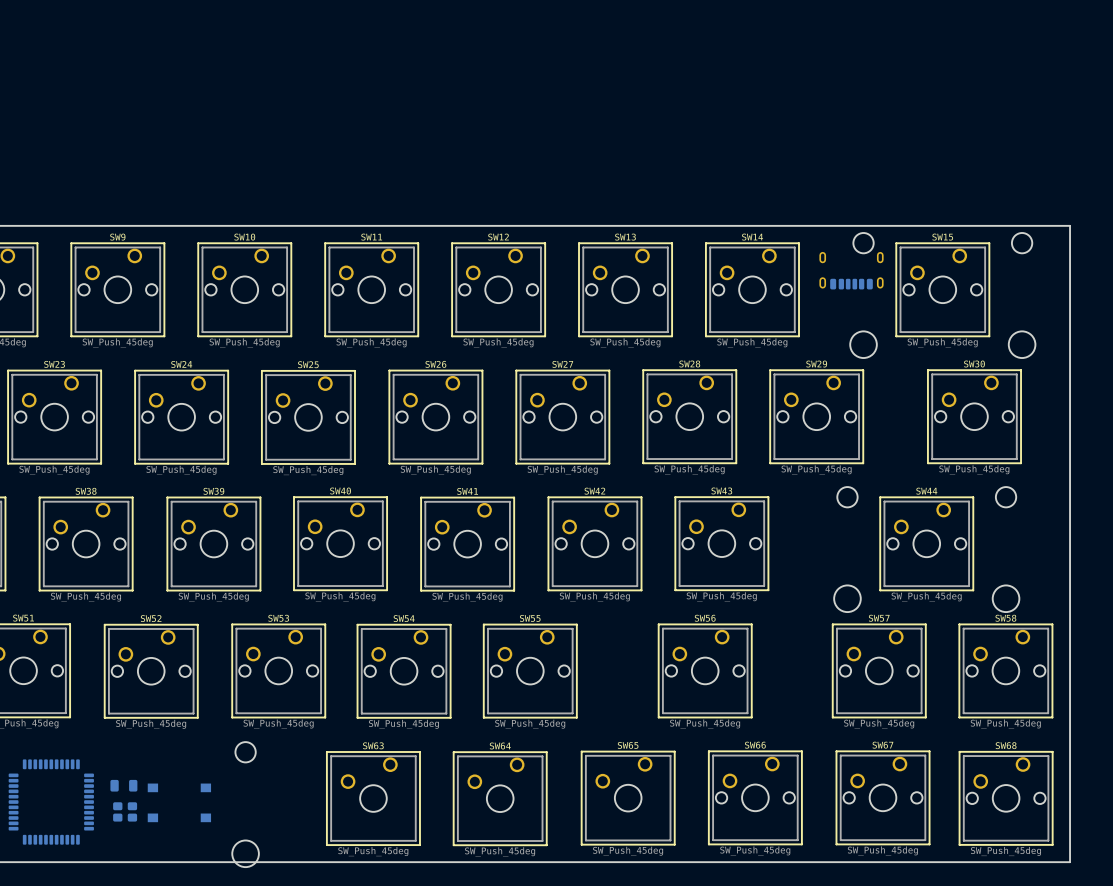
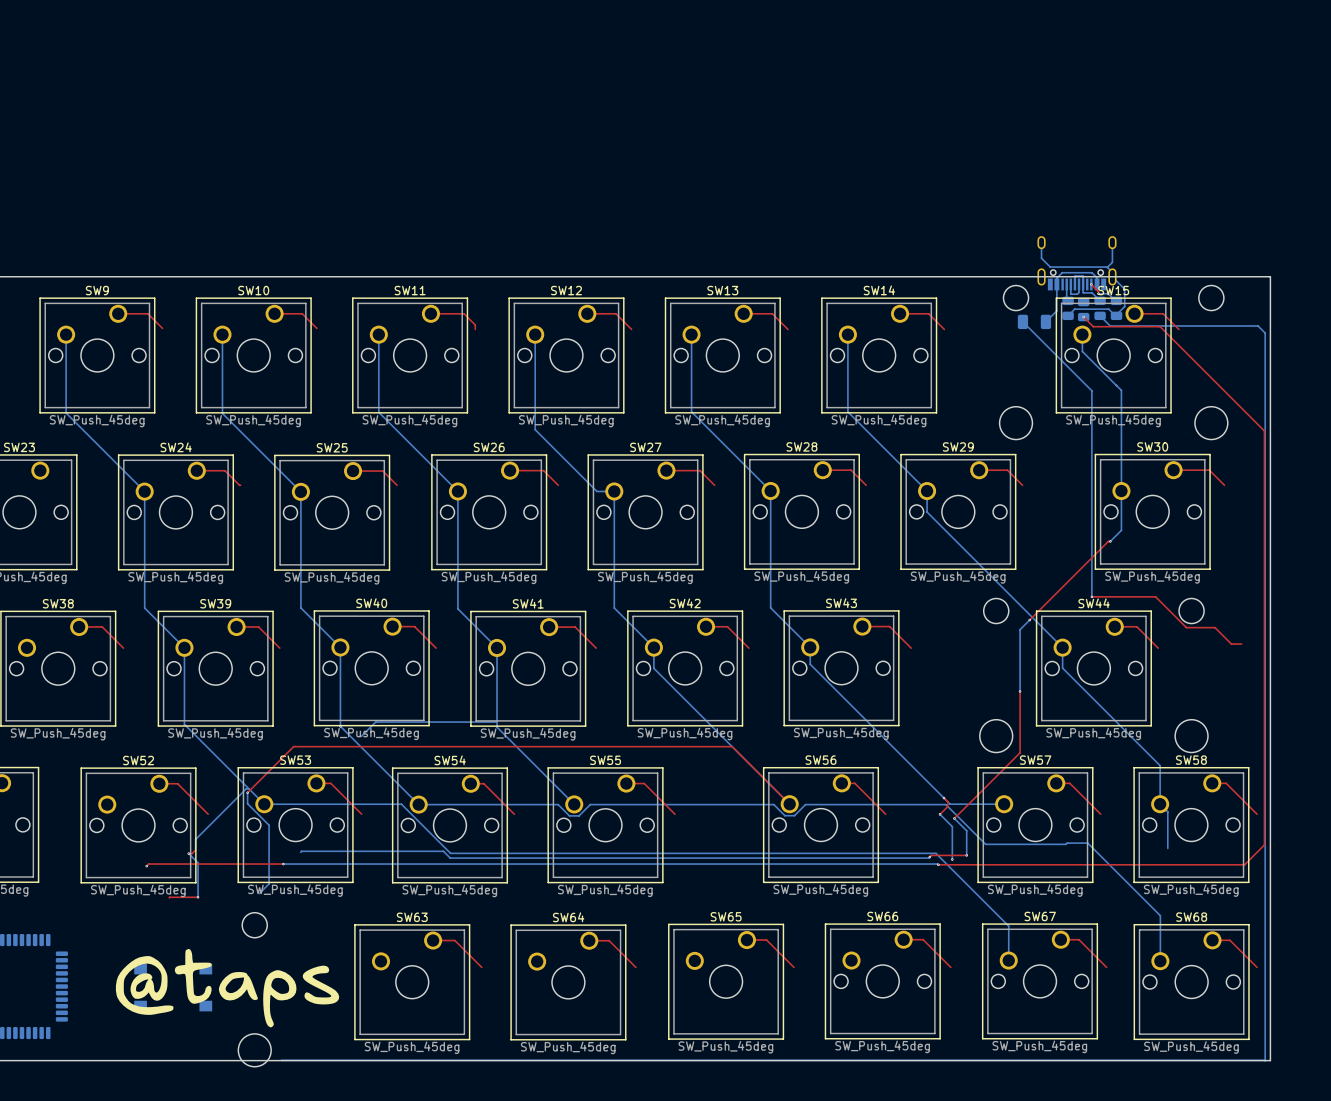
bottom track: none -> (1041, 242) (1041, 258) (1050, 267) (1107, 267) (1112, 272) (1112, 276) (1124, 289) (1124, 306) (1115, 315) (1108, 309) (1074, 309) (1068, 315)
bottom track: none -> (1112, 242) (1112, 262) (1107, 267)
part: none -> (1076, 263)
bottom track: none -> (1066, 284) (1068, 300)
bottom track: none -> (1070, 284) (1071, 294) (1079, 292) (1079, 284)
bottom track: none -> (1074, 284) (1074, 276) (1082, 276) (1083, 292) (1092, 292) (1100, 300)
top track: none -> (1091, 284) (1098, 293)
via: none -> (1091, 284)
bottom track: none -> (1097, 284) (1097, 277) (1091, 272) (1062, 272) (1056, 278) (1056, 310) (1045, 321)
bottom track: none -> (1098, 293) (1108, 293) (1115, 300)
via: none -> (1098, 293)
part: none -> (1068, 308)
part: none -> (1100, 308)
part: none -> (1116, 308)
part: none -> (1083, 309)
top track: none -> (118, 313) (147, 313) (162, 328)
top track: none -> (274, 313) (302, 313) (316, 328)
top track: none -> (430, 313) (464, 313) (475, 324) (475, 329)
top track: none -> (587, 313) (615, 313) (631, 329)
top track: none -> (743, 313) (772, 313) (787, 329)
top track: none -> (900, 313) (928, 313) (944, 329)
top track: none -> (1134, 313) (1163, 313) (1178, 329)
bottom track: none -> (1100, 315) (1110, 326) (1258, 326) (1265, 333) (1265, 1060) (281, 1060)
top track: none -> (1083, 317) (1093, 326) (1160, 326) (1264, 431) (1264, 844) (1244, 864) (938, 864)
via: none -> (1083, 317)
bottom track: none -> (1022, 321) (1091, 390) (1091, 596)
part: none -> (1034, 321)
part: (851, 270) -> none
bottom track: none -> (66, 334) (66, 413) (144, 491) (144, 608) (184, 647) (184, 724) (264, 804) (401, 804) (450, 853) (935, 853) (1008, 926) (1008, 960)
bottom track: none -> (222, 334) (222, 413) (300, 491) (300, 607) (340, 647) (340, 726) (418, 804) (558, 804) (569, 815) (579, 815) (590, 804) (773, 804) (784, 815) (794, 815) (805, 804) (945, 804) (985, 844) (1087, 843) (1160, 915) (1160, 961)
bottom track: none -> (378, 334) (378, 412) (457, 491) (457, 608) (497, 647) (497, 727) (574, 804)
bottom track: none -> (535, 334) (535, 429) (596, 491) (614, 491) (614, 608) (653, 647) (653, 668) (789, 804)
bottom track: none -> (691, 334) (691, 411) (770, 491) (770, 607) (810, 647) (810, 664) (950, 804) (1004, 804)
bottom track: none -> (847, 334) (847, 411) (927, 491) (927, 512) (1062, 647) (1062, 668) (1160, 765) (1160, 804) (1167, 811) (1167, 848)
bottom track: none -> (1082, 334) (1082, 351) (1121, 390) (1121, 530) (1110, 541)
top track: none -> (822, 470) (851, 470) (866, 485)
top track: none -> (979, 470) (1007, 470) (1022, 485)
top track: none -> (1173, 470) (1209, 470) (1224, 485)
top track: none -> (196, 470) (225, 470) (240, 485)
top track: none -> (353, 471) (382, 471) (397, 485)
top track: none -> (510, 470) (543, 470) (558, 485)
top track: none -> (666, 470) (699, 470) (714, 485)
top track: none -> (1110, 541) (1029, 619)
via: none -> (1110, 541)
top track: none -> (1091, 596) (1155, 596) (1186, 627) (1215, 627) (1231, 644) (1241, 644)
via: none -> (1091, 596)
bottom track: none -> (1029, 619) (1020, 629) (1020, 691)
via: none -> (1029, 619)
top track: none -> (392, 626) (414, 626) (436, 648)
top track: none -> (862, 626) (889, 626) (911, 648)
top track: none -> (79, 626) (102, 626) (123, 648)
top track: none -> (236, 626) (258, 626) (279, 648)
top track: none -> (549, 627) (575, 627) (596, 648)
top track: none -> (706, 626) (727, 626) (748, 648)
top track: none -> (1114, 626) (1136, 626) (1158, 648)
top track: none -> (1020, 691) (1020, 752) (954, 818)
via: none -> (1020, 691)
bottom track: none -> (497, 722) (375, 722) (361, 736)
via: none -> (340, 726)
top track: none -> (159, 783) (177, 783) (208, 814)
top track: none -> (316, 783) (330, 783) (361, 814)
top track: none -> (470, 783) (483, 783) (514, 814)
top track: none -> (626, 783) (644, 783) (674, 814)
top track: none -> (841, 783) (854, 783) (885, 814)
top track: none -> (1056, 783) (1069, 783) (1100, 814)
top track: none -> (1212, 783) (1226, 783) (1257, 814)
bottom track: none -> (249, 789) (246, 789) (195, 839) (195, 850)
top track: none -> (247, 792) (293, 746) (732, 746) (789, 804)
bottom track: none -> (247, 792) (247, 803) (269, 825) (269, 883) (259, 893)
via: none -> (247, 792)
top track: none -> (944, 798) (947, 801) (947, 806) (940, 814)
via: none -> (944, 798)
bottom track: none -> (940, 814) (952, 826) (952, 859)
via: none -> (940, 814)
bottom track: none -> (954, 818) (966, 830) (966, 855)
via: none -> (954, 818)
top track: none -> (195, 850) (192, 853) (188, 853)
bottom track: none -> (300, 852) (443, 851) (450, 858) (929, 857)
bottom track: none -> (188, 853) (198, 862) (198, 897)
via: none -> (188, 853)
top track: none -> (966, 855) (931, 855) (929, 857)
via: none -> (966, 855)
via: none -> (929, 857)
via: none -> (952, 859)
top track: none -> (283, 864) (148, 864) (146, 866)
bottom track: none -> (283, 864) (938, 864)
via: none -> (283, 864)
via: none -> (938, 864)
via: none -> (146, 866)
top track: none -> (198, 897) (169, 897)
via: none -> (198, 897)
top track: none -> (433, 940) (454, 940) (481, 967)
top track: none -> (589, 940) (609, 940) (635, 967)
top track: none -> (746, 940) (766, 940) (793, 967)
top track: none -> (903, 939) (923, 939) (950, 967)
top track: none -> (1060, 939) (1078, 939) (1106, 967)
top track: none -> (1212, 940) (1229, 940) (1257, 967)
drawing: none -> [115, 948, 340, 1028]
part: (123, 785) -> none
part: (125, 811) -> none

